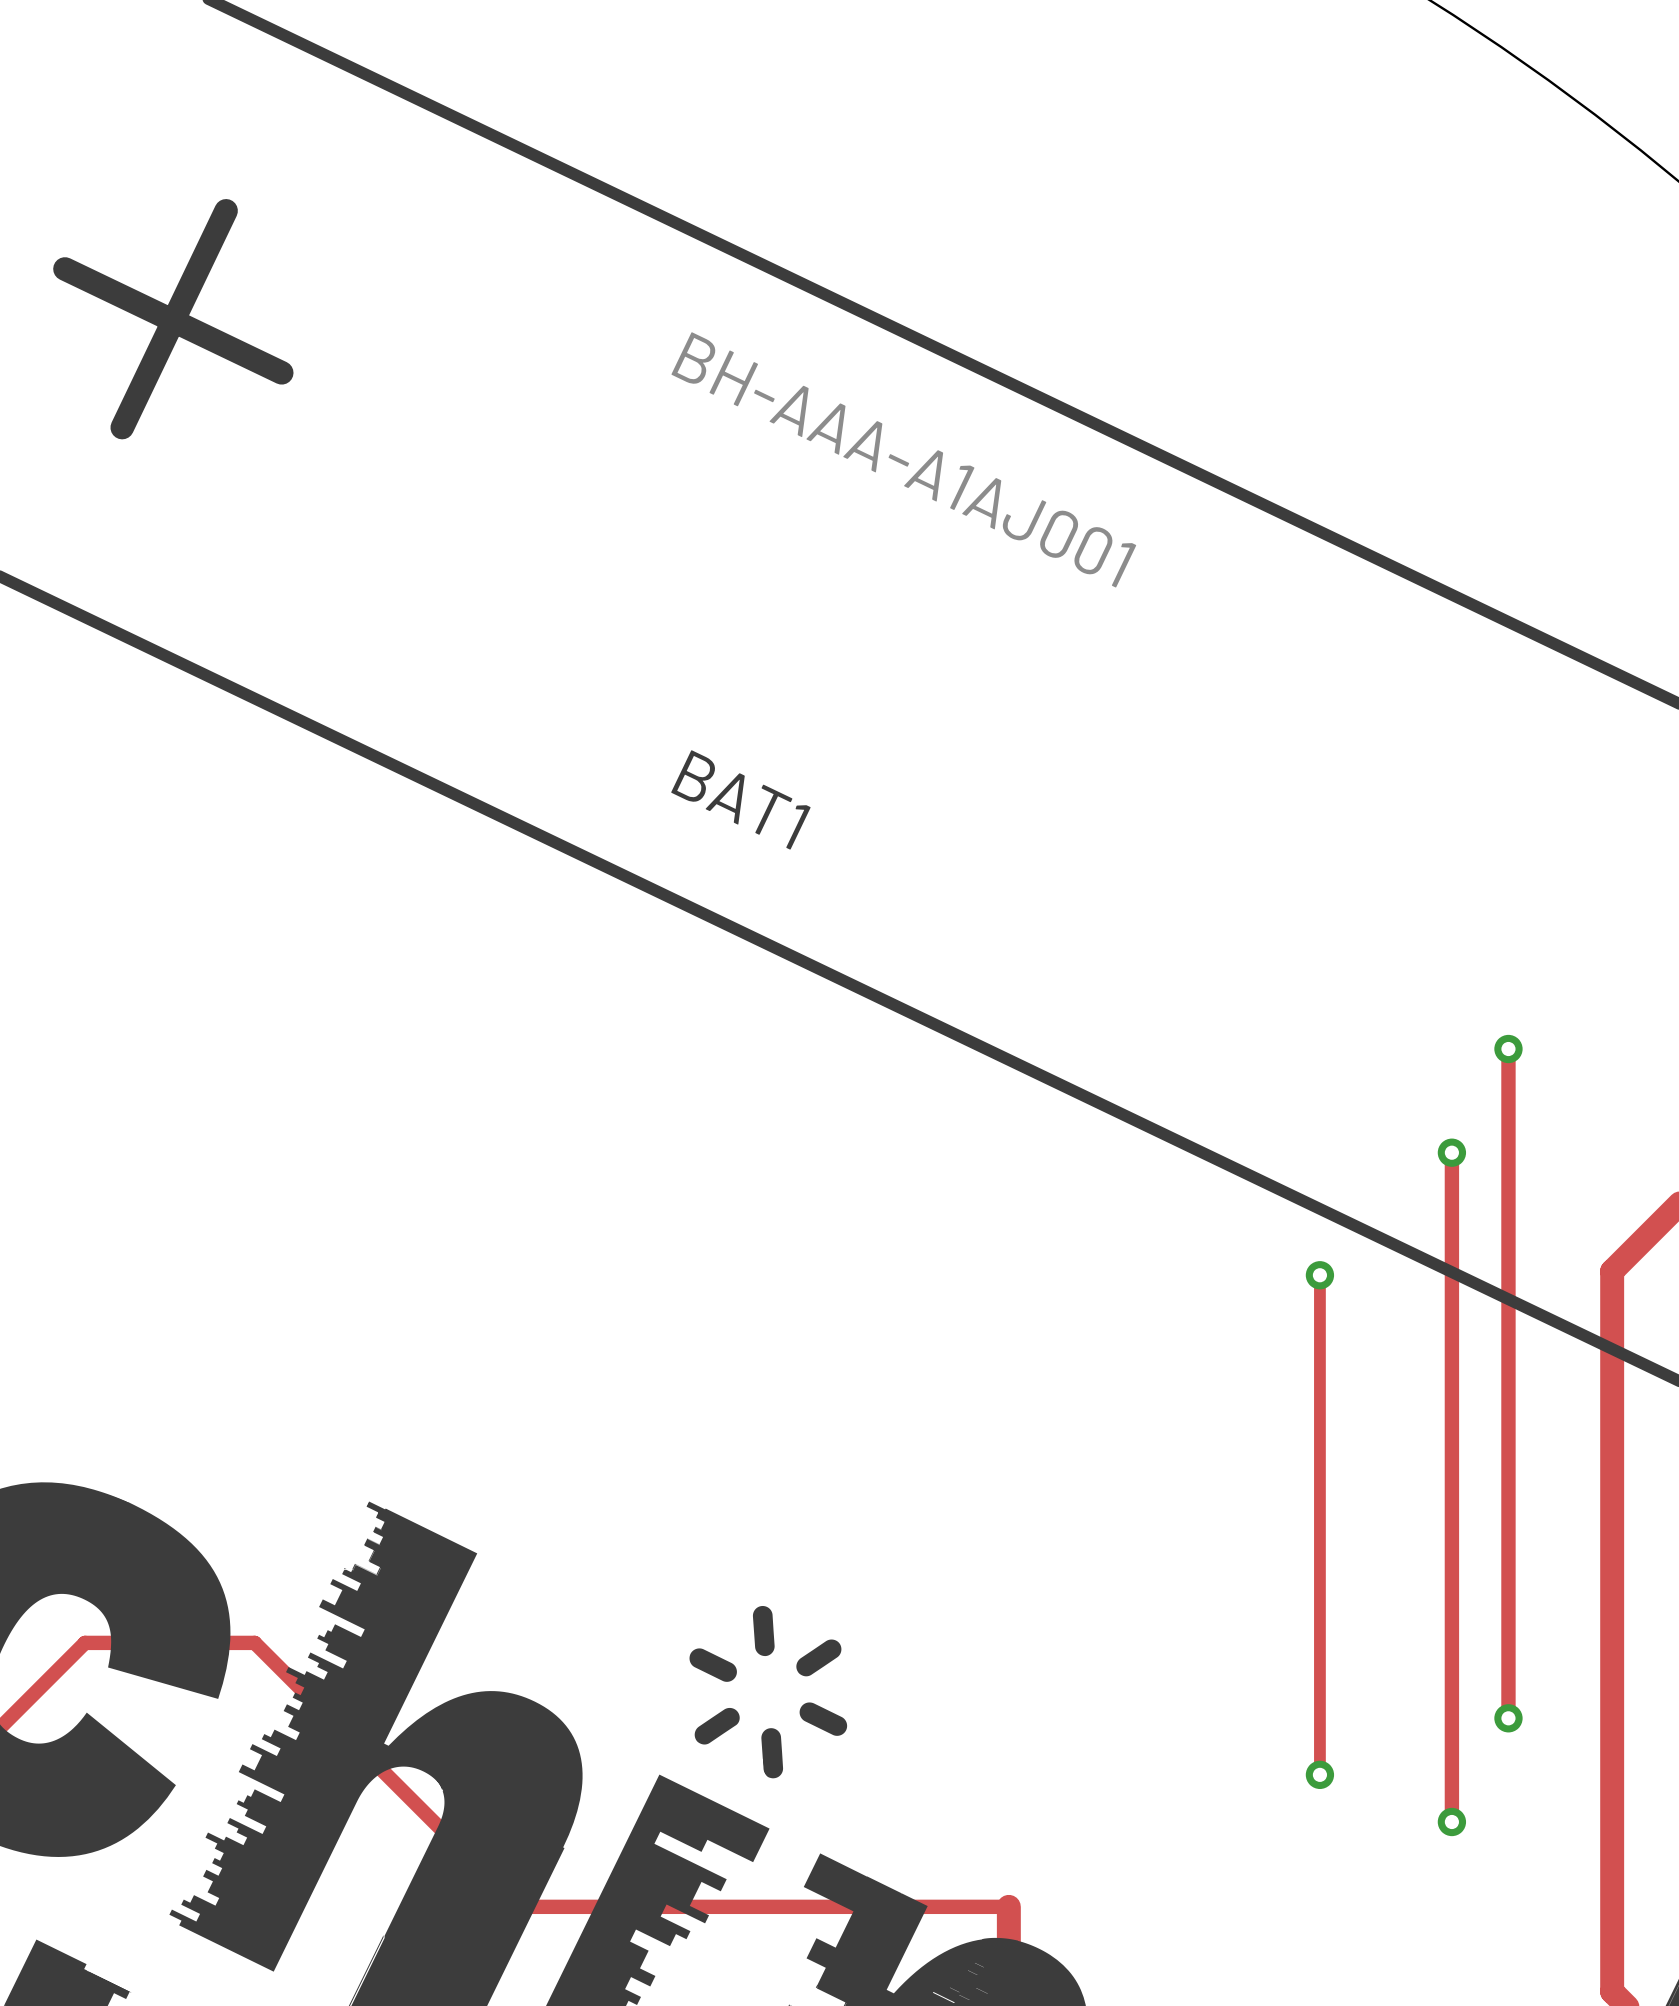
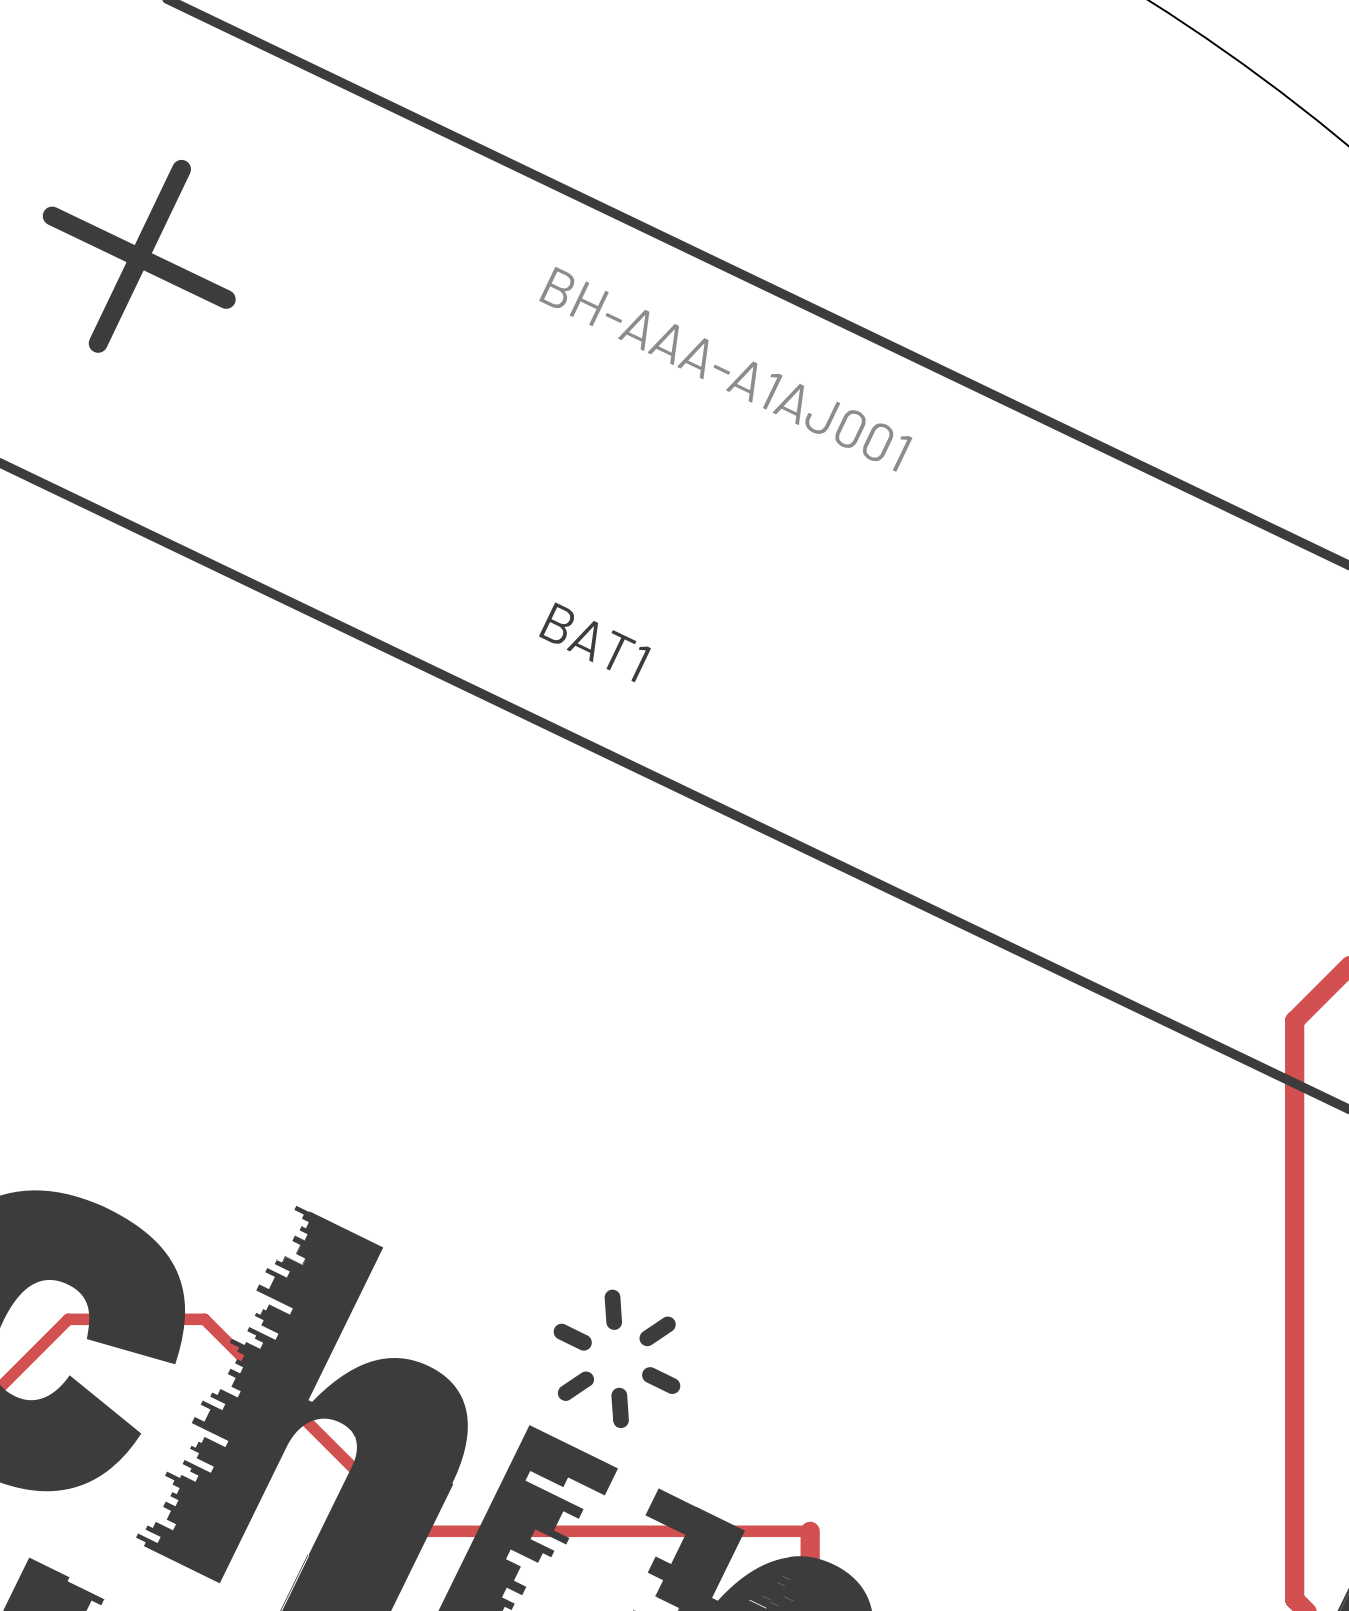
track: (1508, 1049) (1508, 1718) -> none
via: (1508, 1049) -> none
track: (1451, 1152) (1451, 1822) -> none
via: (1451, 1152) -> none
track: (1319, 1275) (1319, 1774) -> none
via: (1319, 1275) -> none
via: (1508, 1718) -> none
via: (1319, 1774) -> none
via: (1451, 1822) -> none

